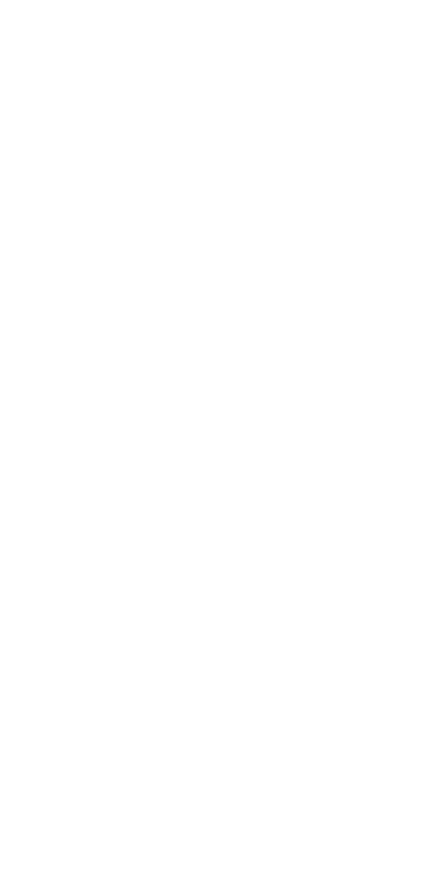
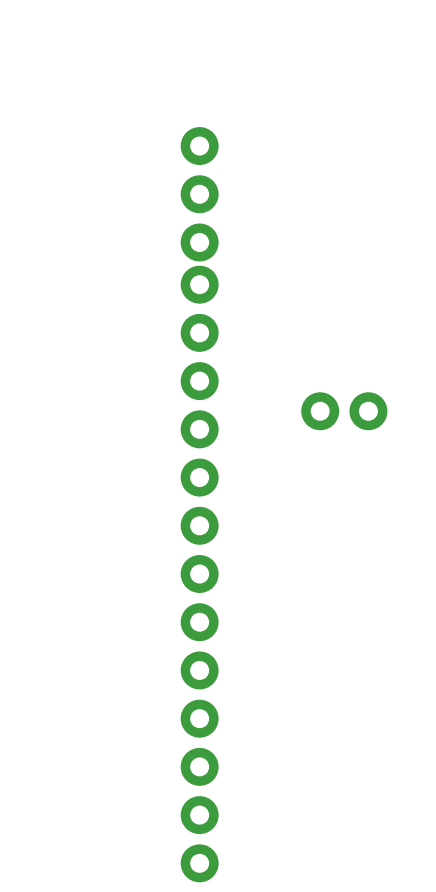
via: none -> (199, 146)
via: none -> (199, 194)
via: none -> (199, 242)
via: none -> (199, 284)
via: none -> (199, 332)
via: none -> (199, 381)
via: none -> (320, 411)
via: none -> (368, 411)
via: none -> (199, 429)
via: none -> (199, 477)
via: none -> (199, 525)
via: none -> (199, 574)
via: none -> (199, 622)
via: none -> (199, 670)
via: none -> (199, 718)
via: none -> (199, 766)
via: none -> (199, 815)
via: none -> (199, 863)

